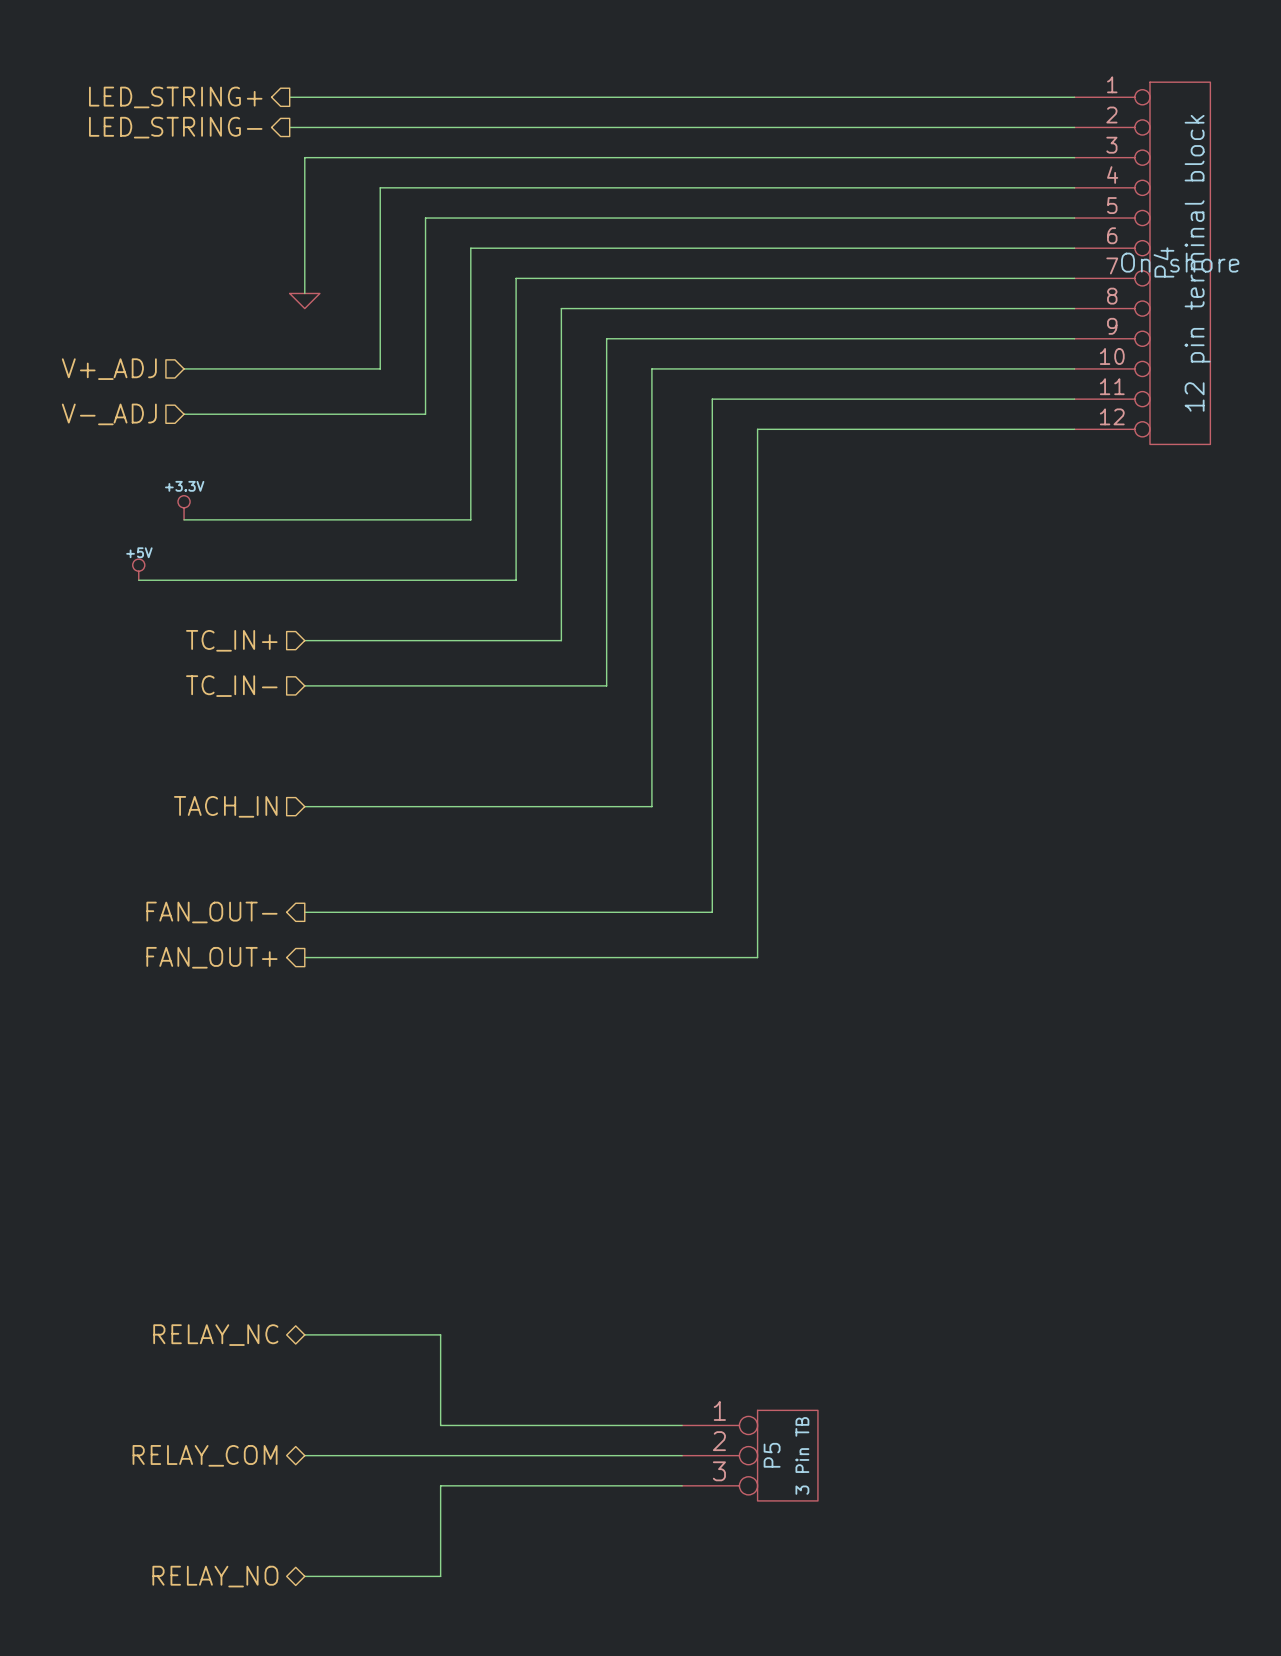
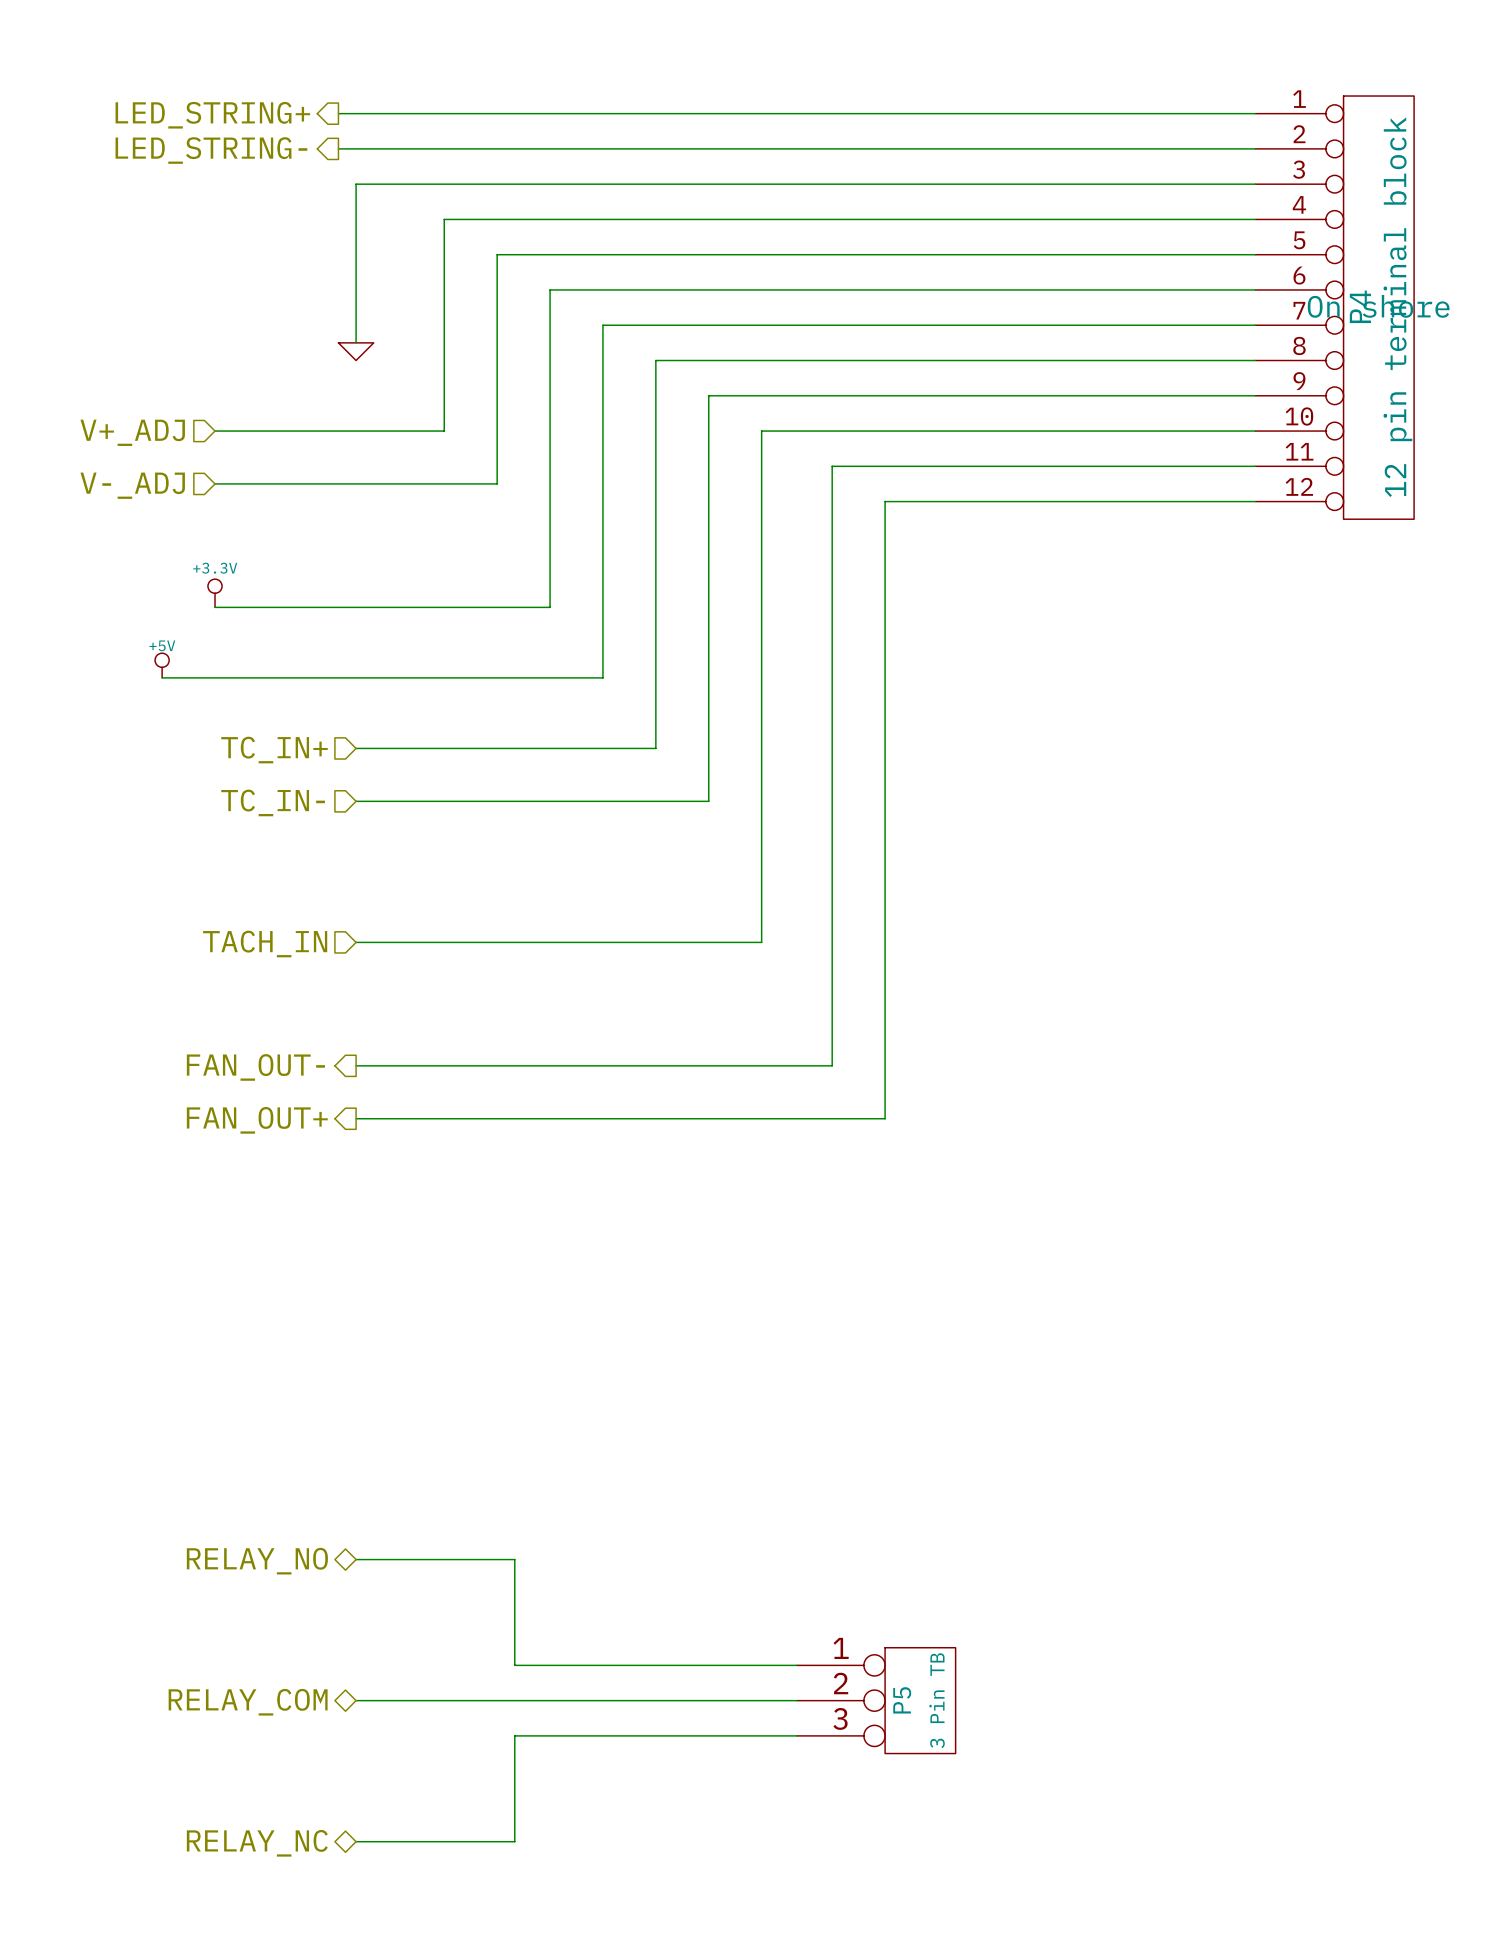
hierarchical label: RELAY_NC (215, 1335) -> RELAY_NO (257, 1561)
hierarchical label: RELAY_NO (215, 1576) -> RELAY_NC (257, 1843)

